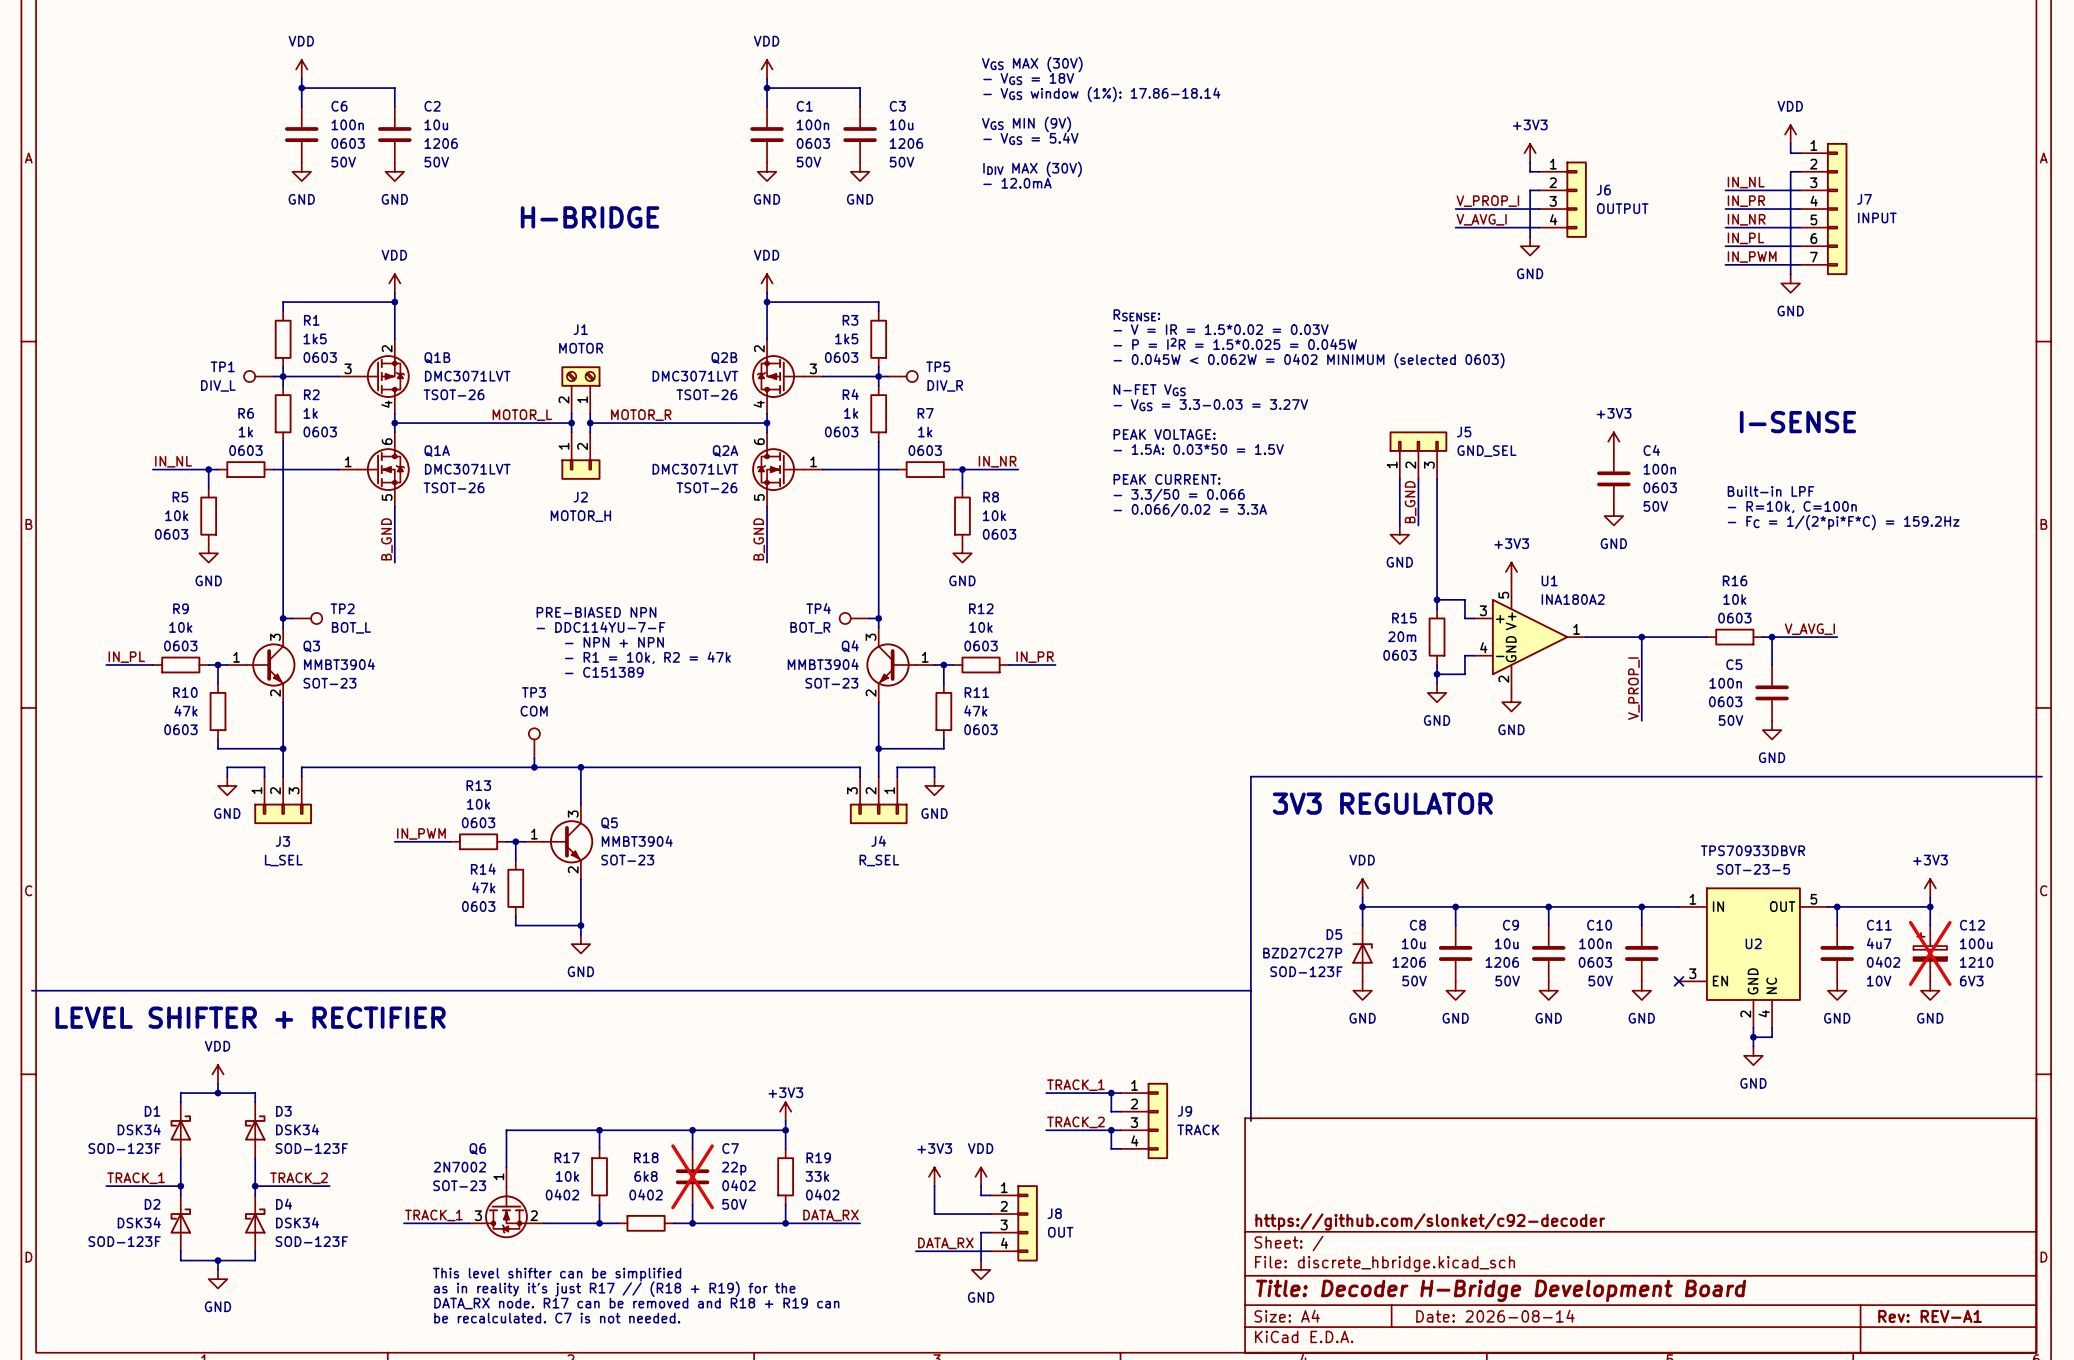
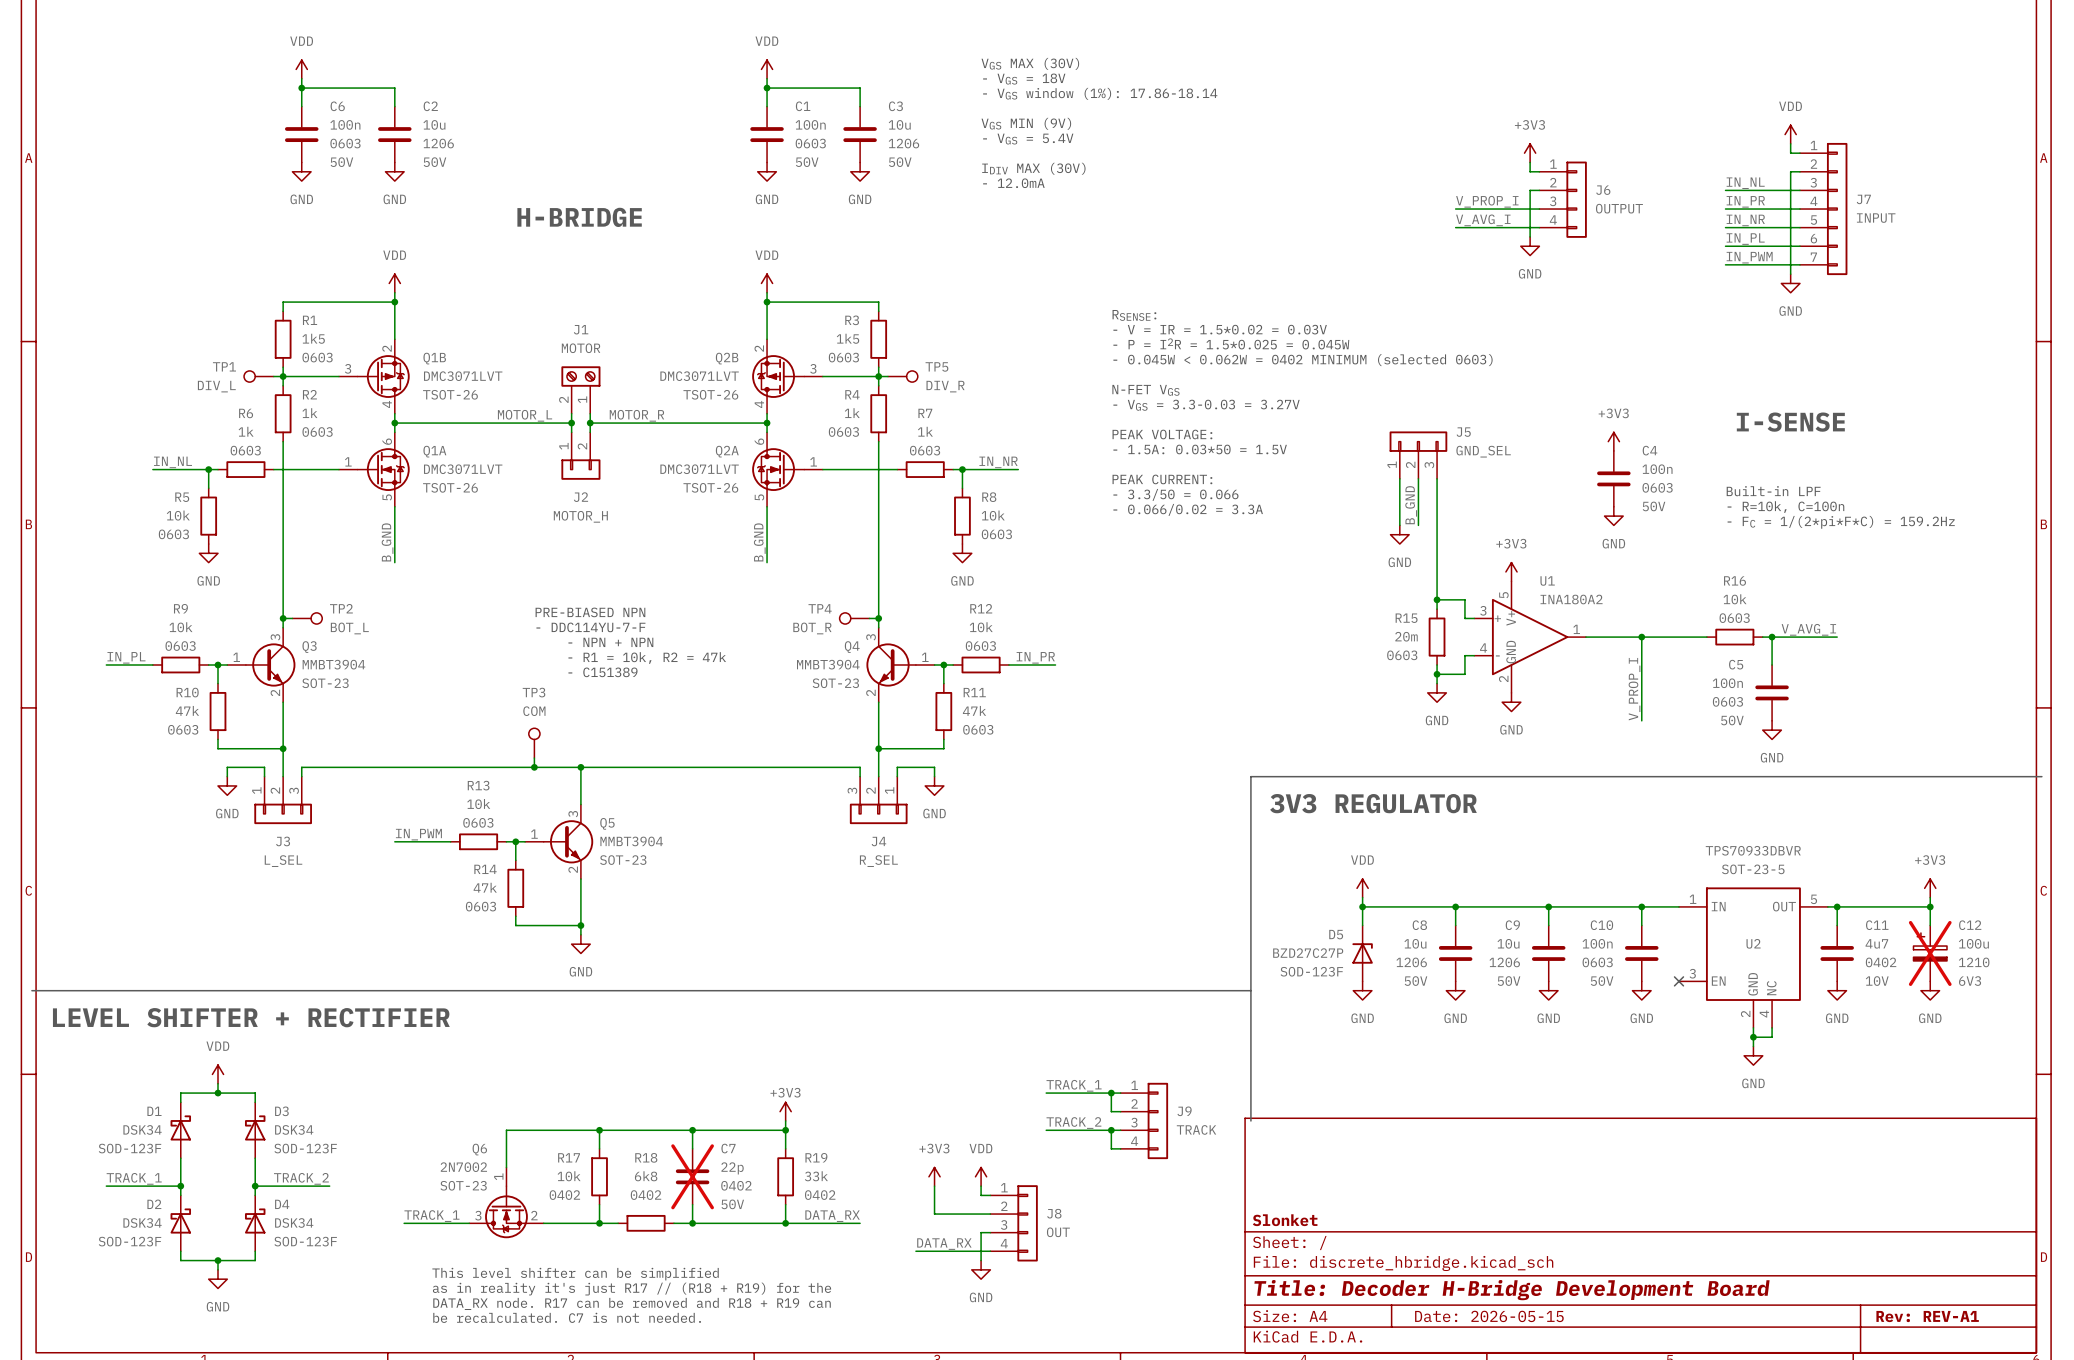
title block: https://github.com/slonket/c92-decoder (1430, 1222) -> Slonket (1285, 1220)
title block: Date: 2026-08-14 (1495, 1316) -> Date: 2026-05-15 (1489, 1316)

